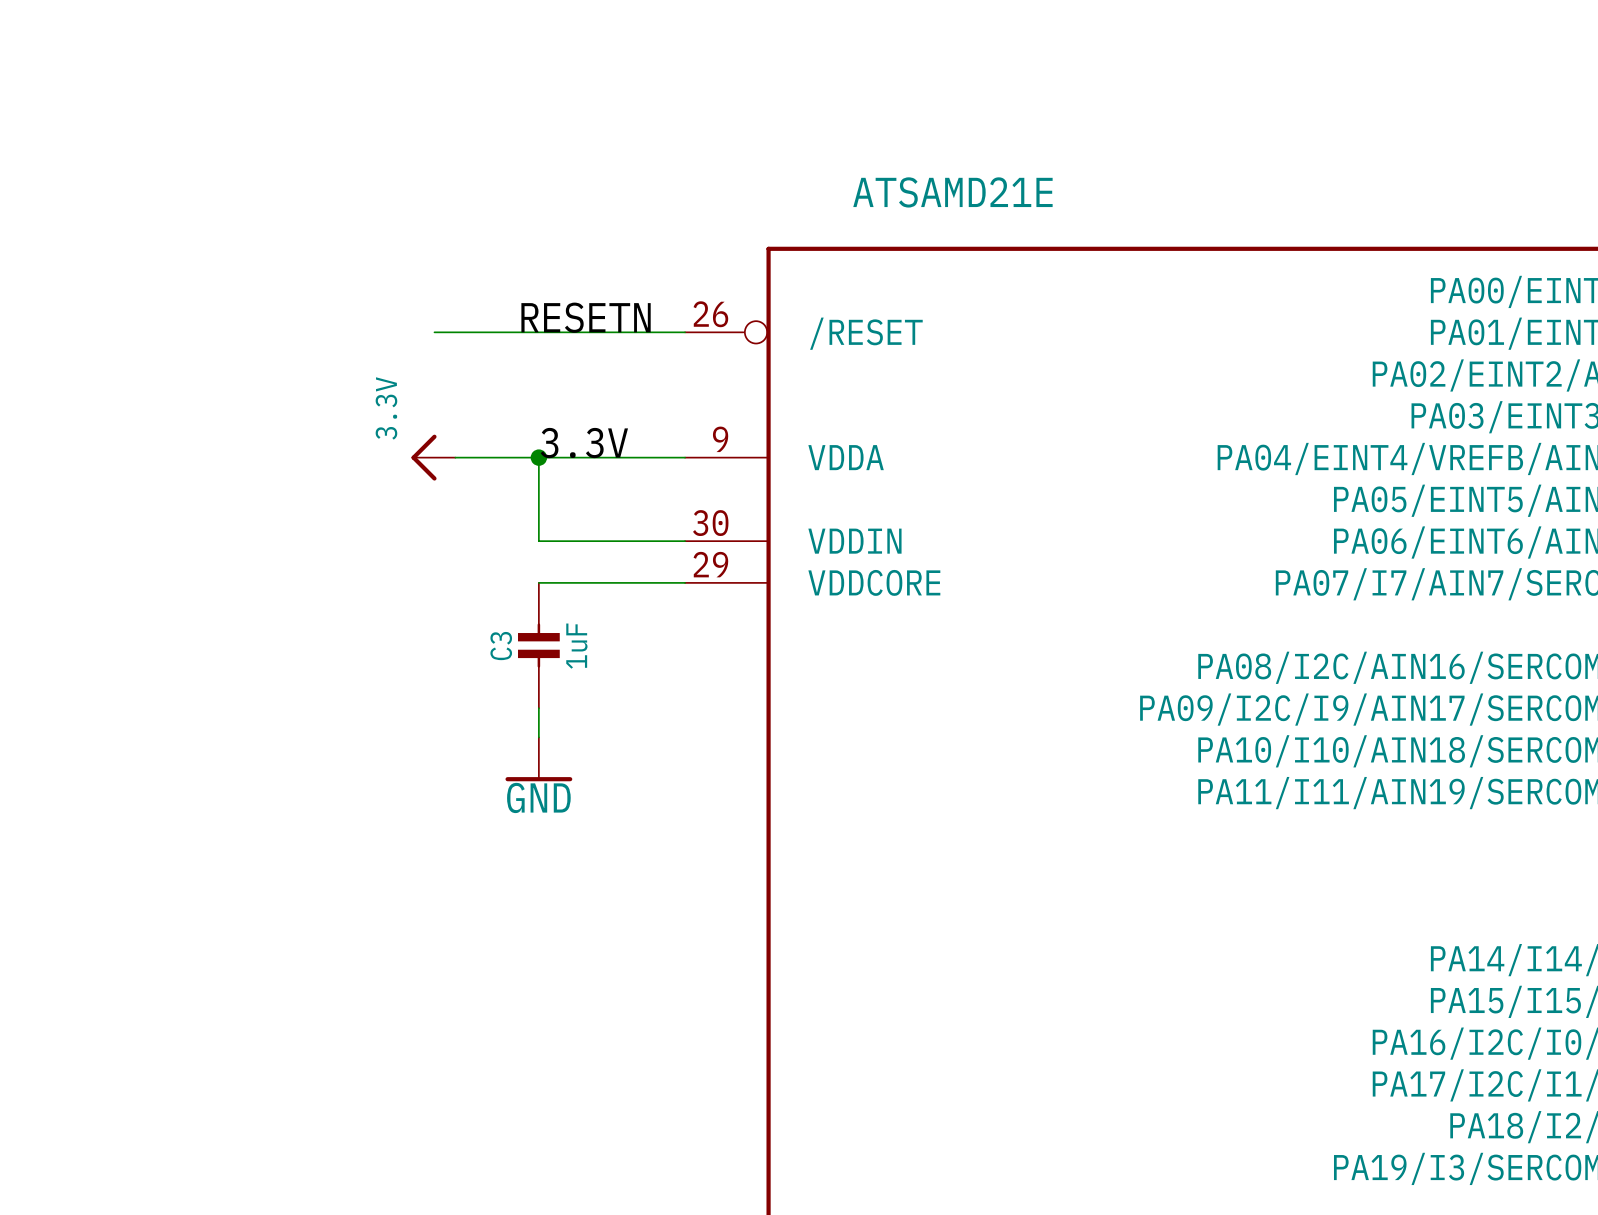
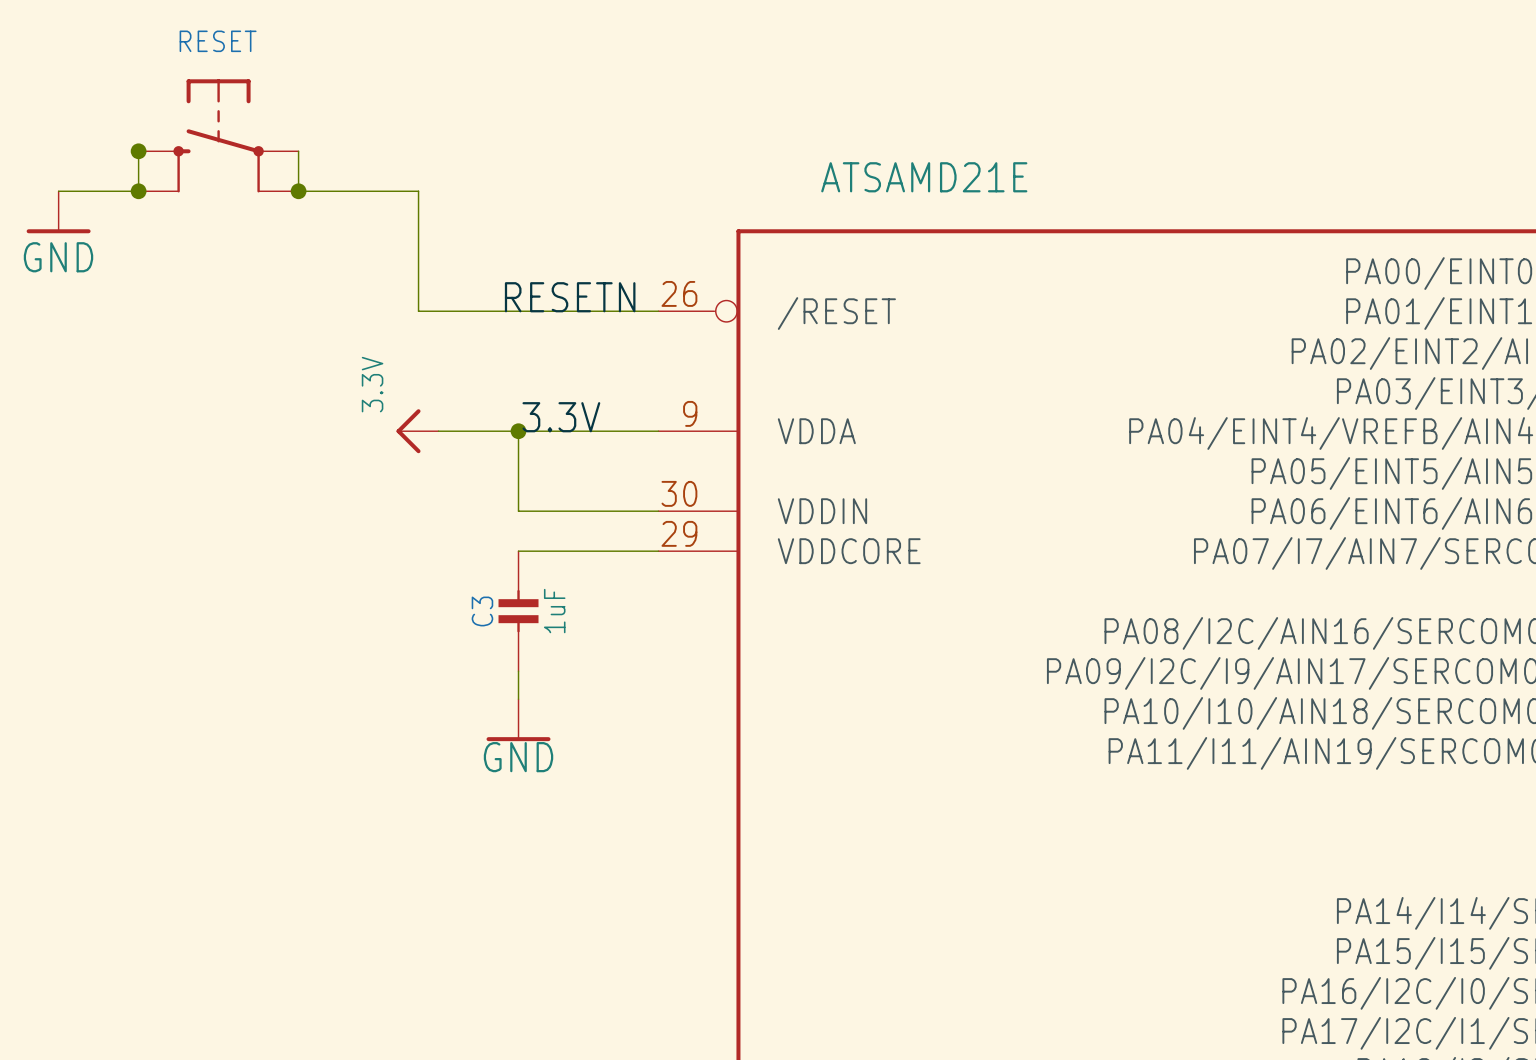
RESET: none -> (218, 135)
wire: none -> (138, 151) (138, 191) (58, 191)
junction: none -> (138, 151)
wire: none -> (298, 151) (298, 191) (418, 191) (418, 311)
junction: none -> (138, 191)
junction: none -> (298, 191)
power symbol: none -> GND (58, 212)

